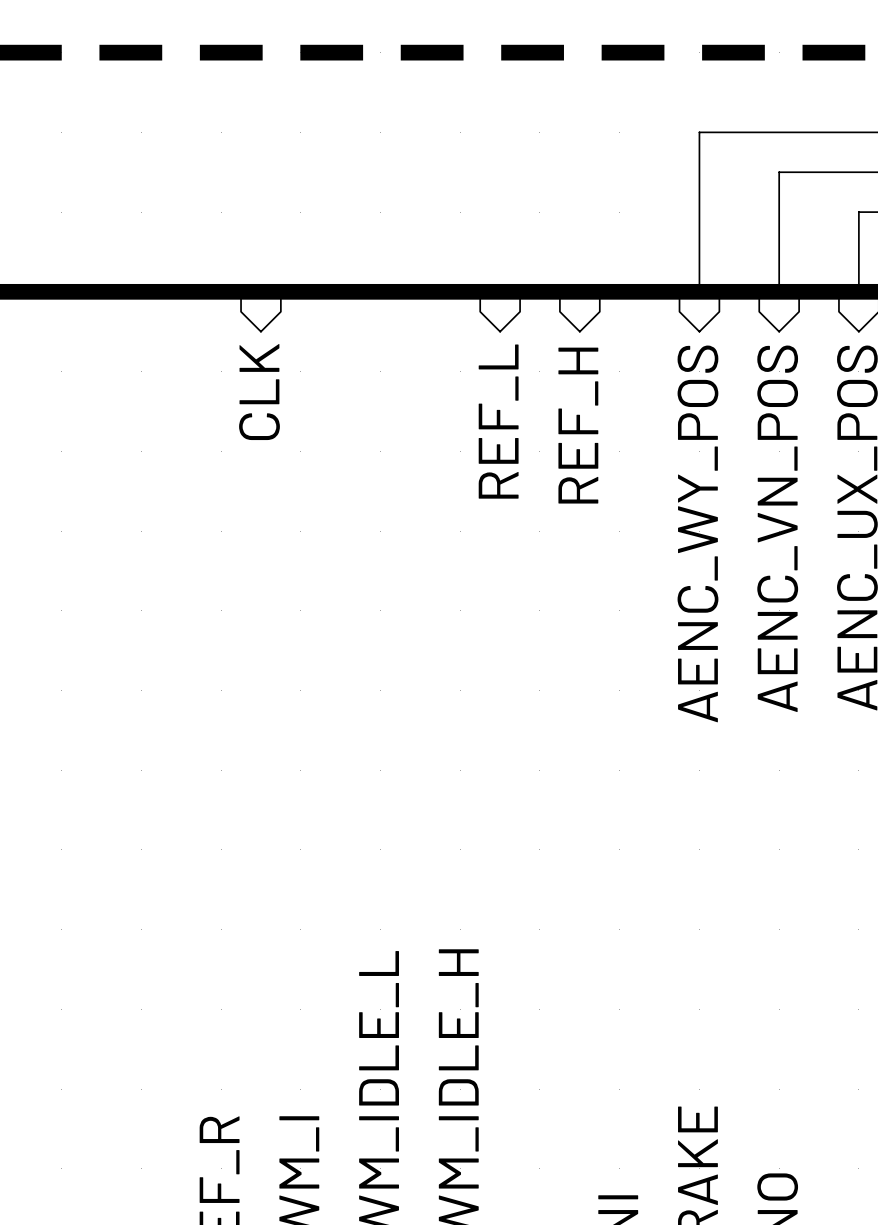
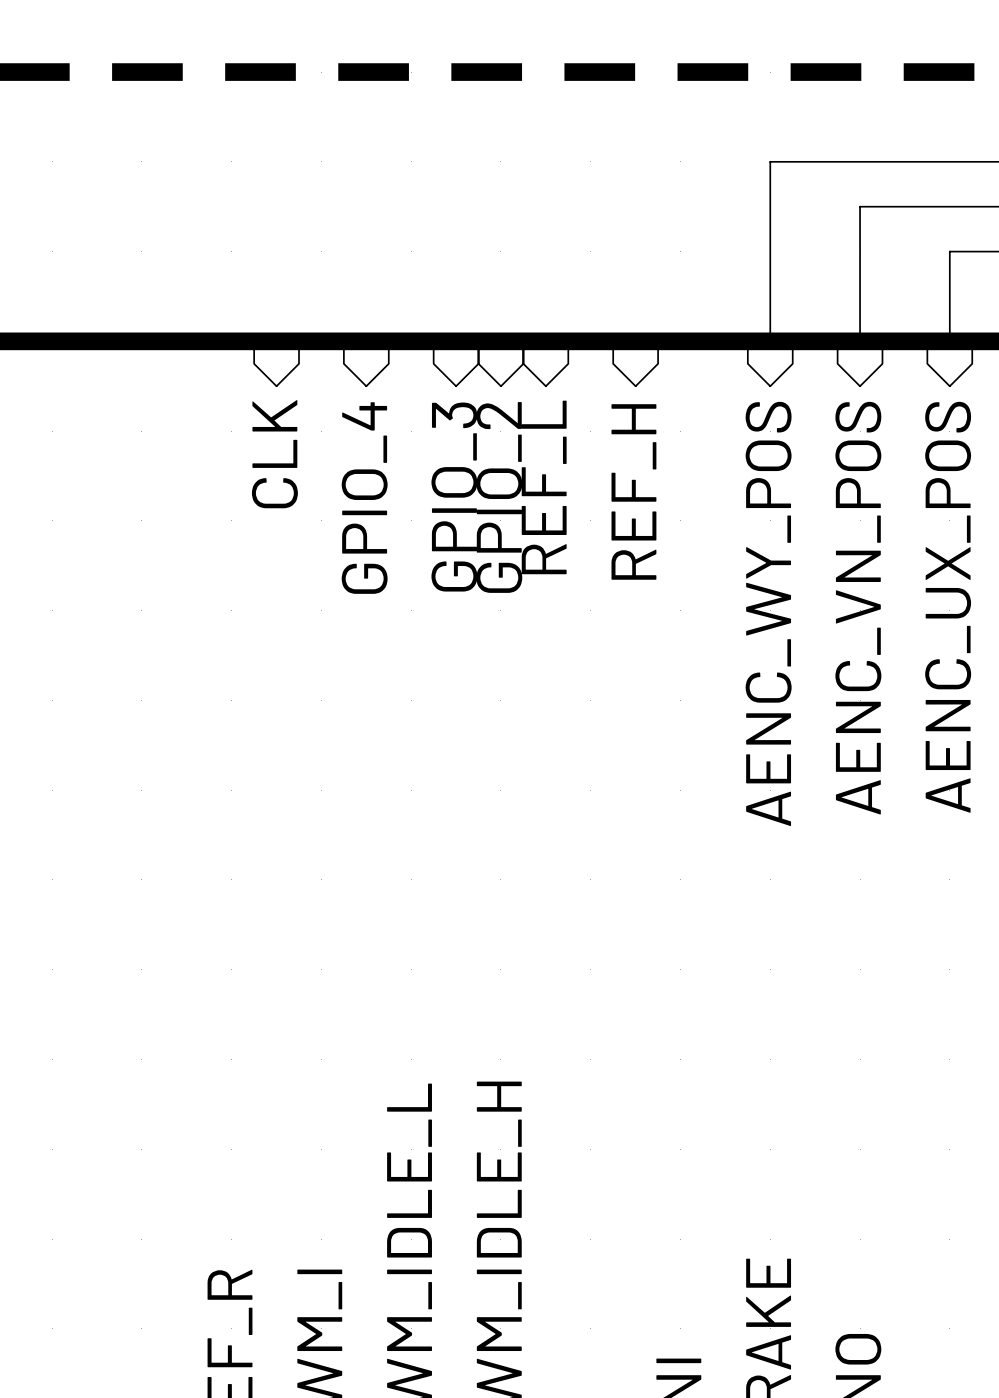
sheet pin: none -> GPIO_3 (454, 497)
sheet pin: none -> GPIO_2 (499, 497)
sheet pin: none -> GPIO_4 (364, 498)

